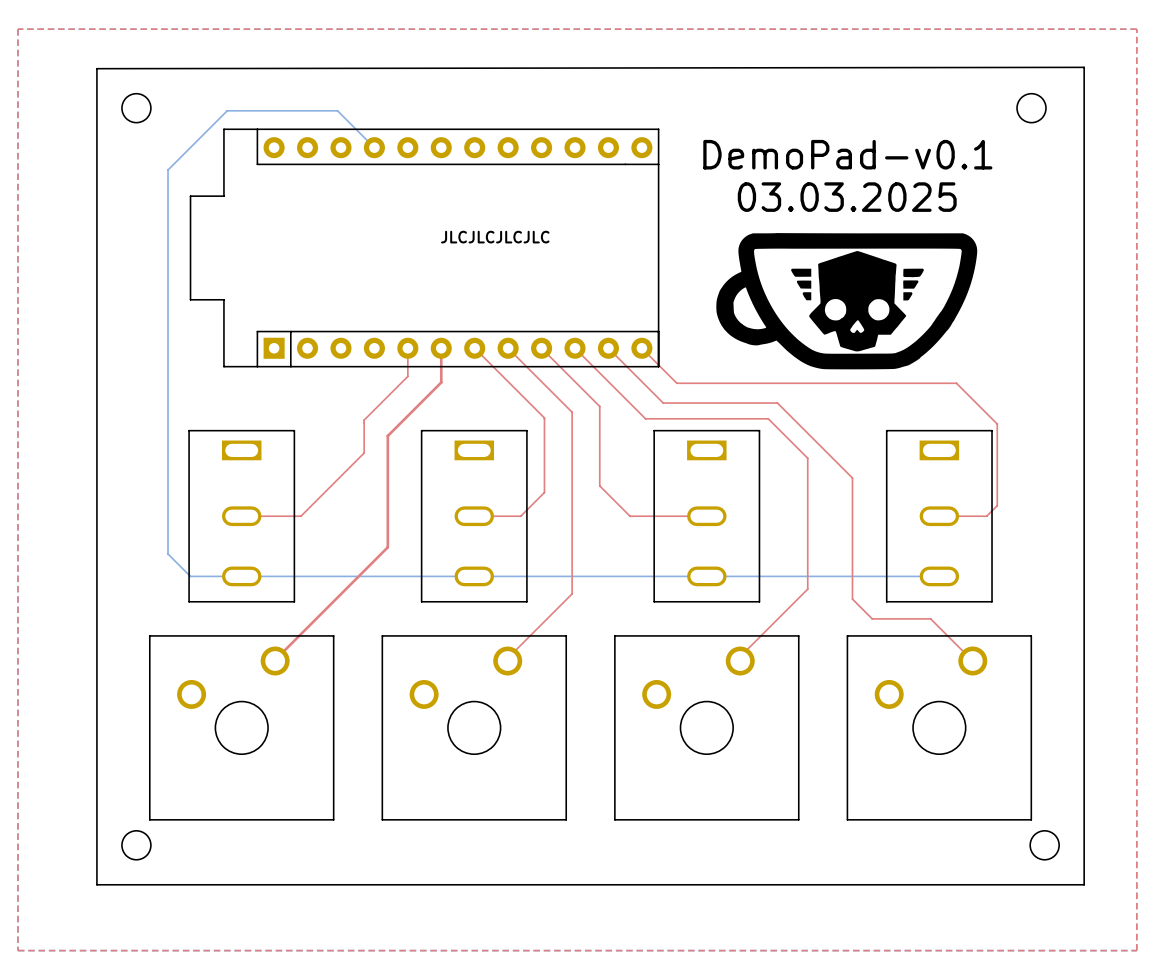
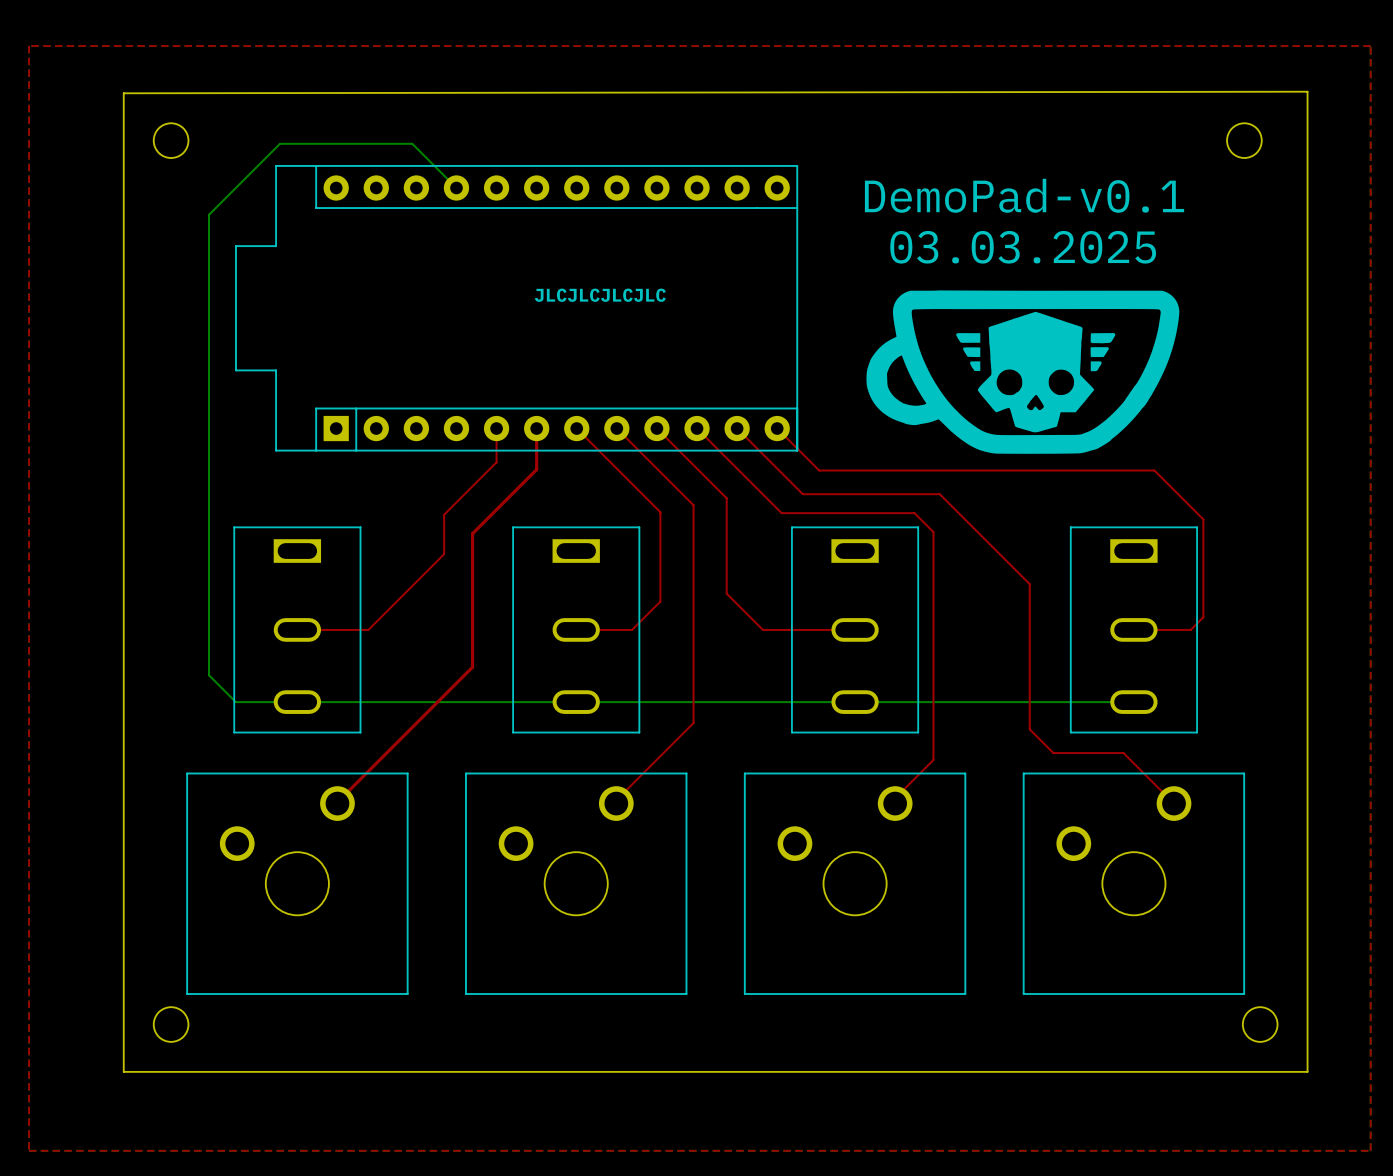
top track: (756, 418) (768, 418) (807, 458) (807, 589) (772, 624) -> (914, 513) (933, 532) (933, 759)

